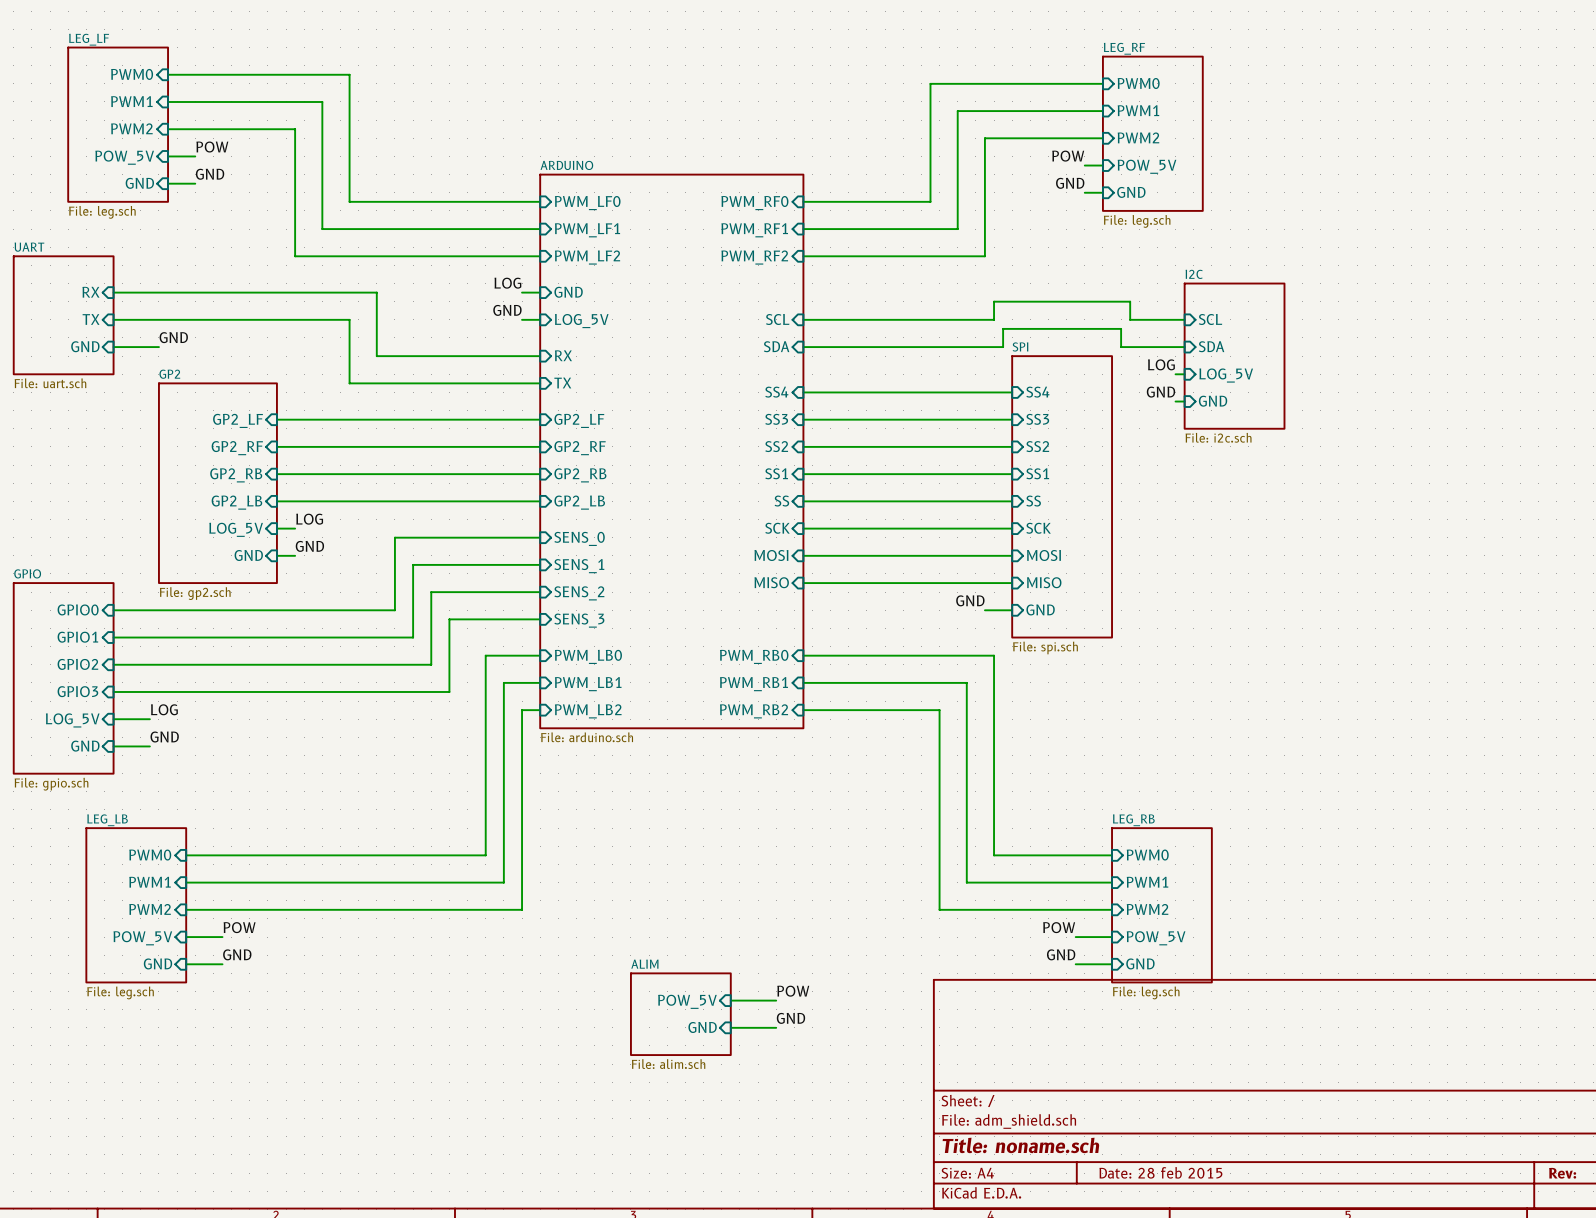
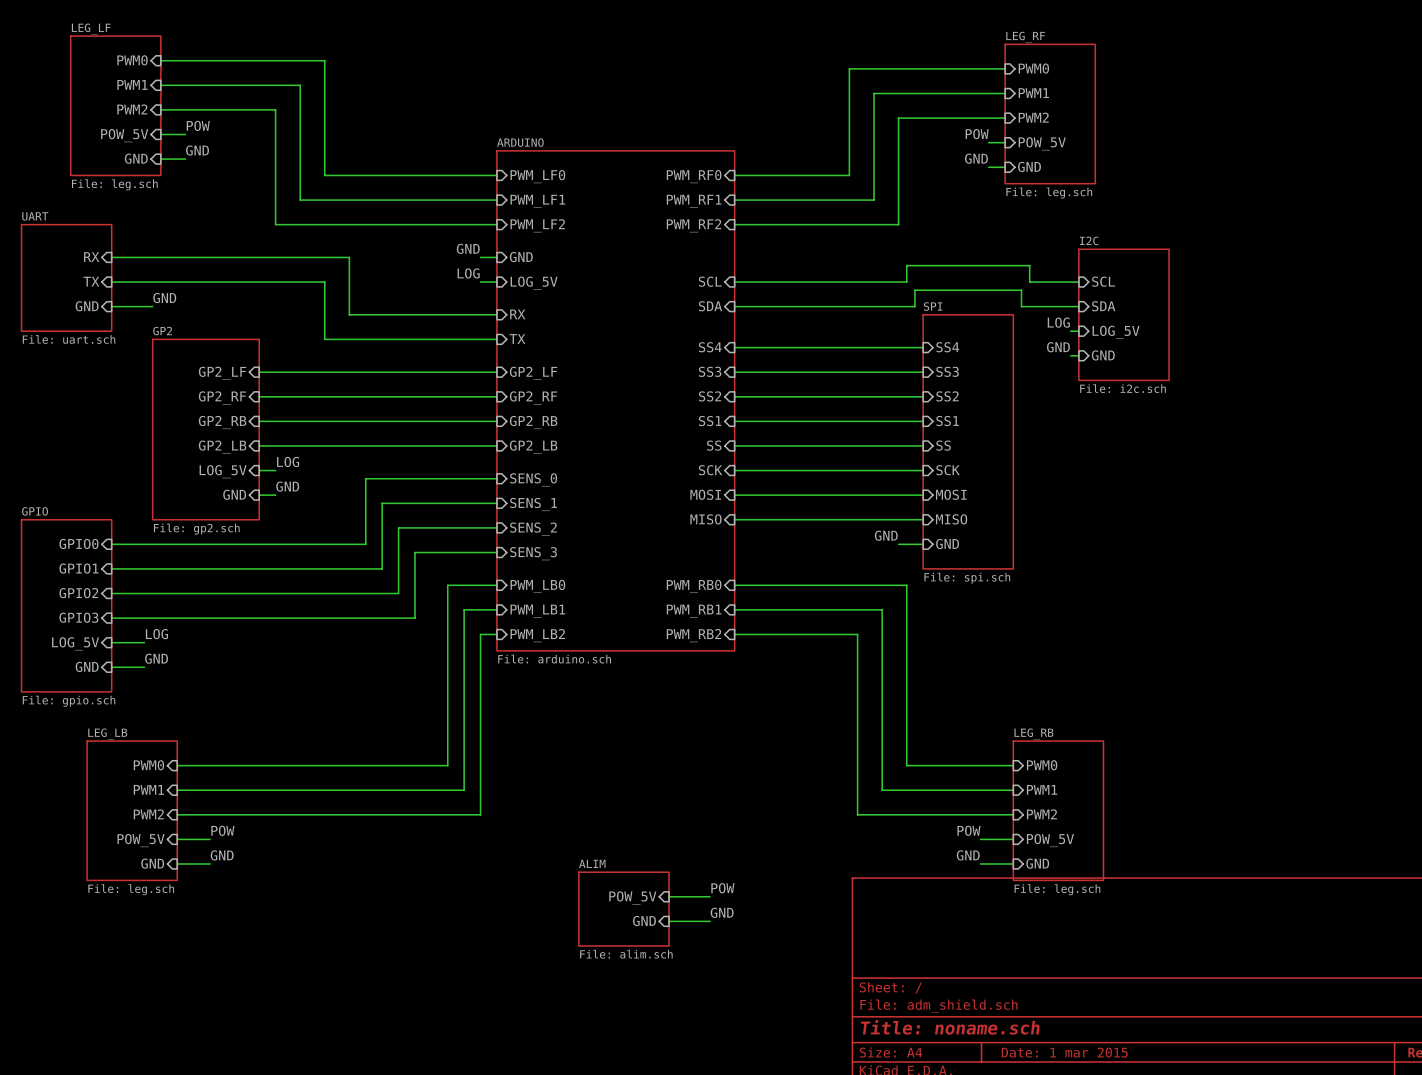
label: LOG (507, 283) -> GND (468, 248)
label: GND (507, 310) -> LOG (468, 273)
title block: Date: 28 feb 2015 (1160, 1172) -> Date: 1 mar 2015 (1064, 1052)

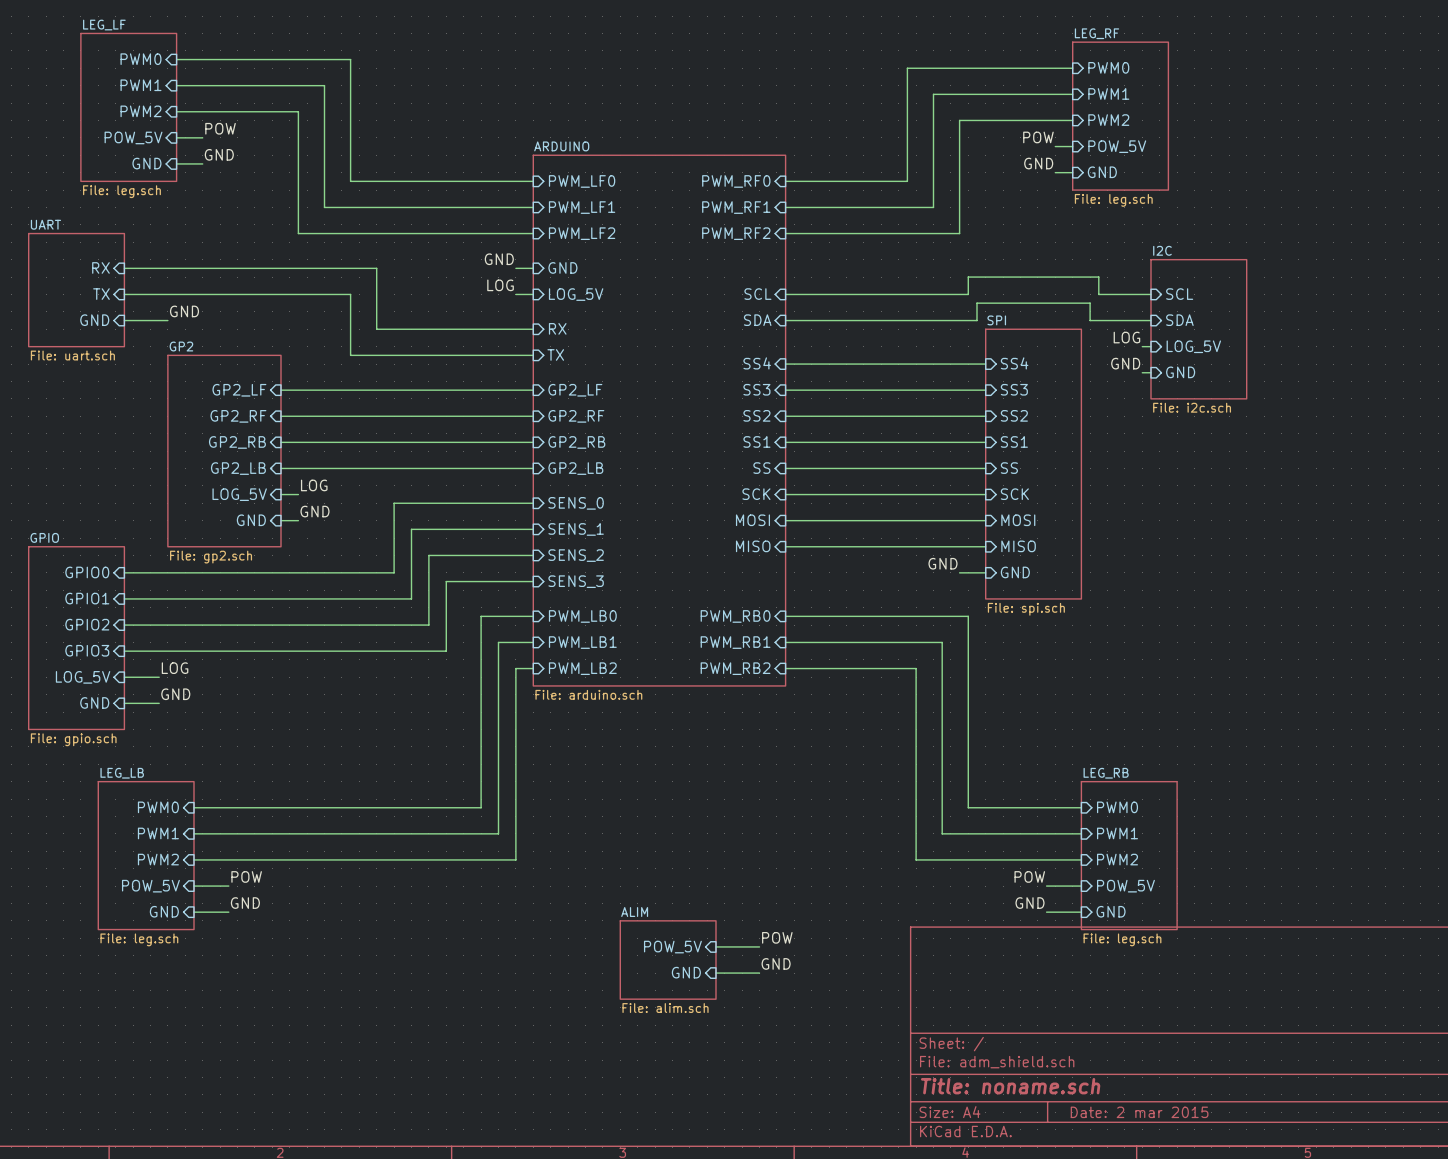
title block: Date: 1 mar 2015 (1064, 1052) -> Date: 2 mar 2015 (1139, 1112)

